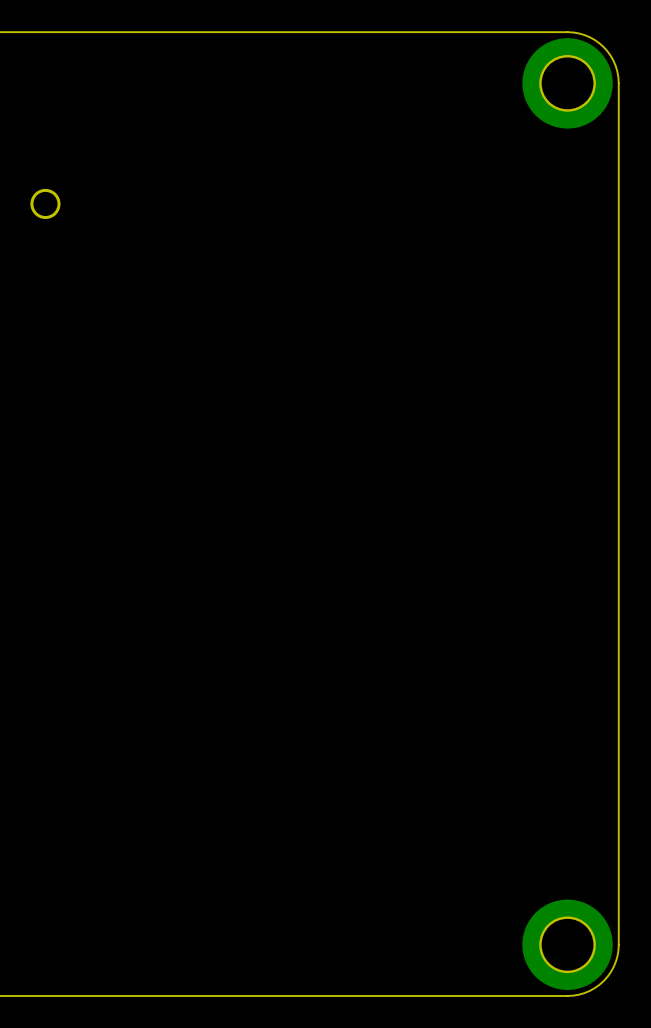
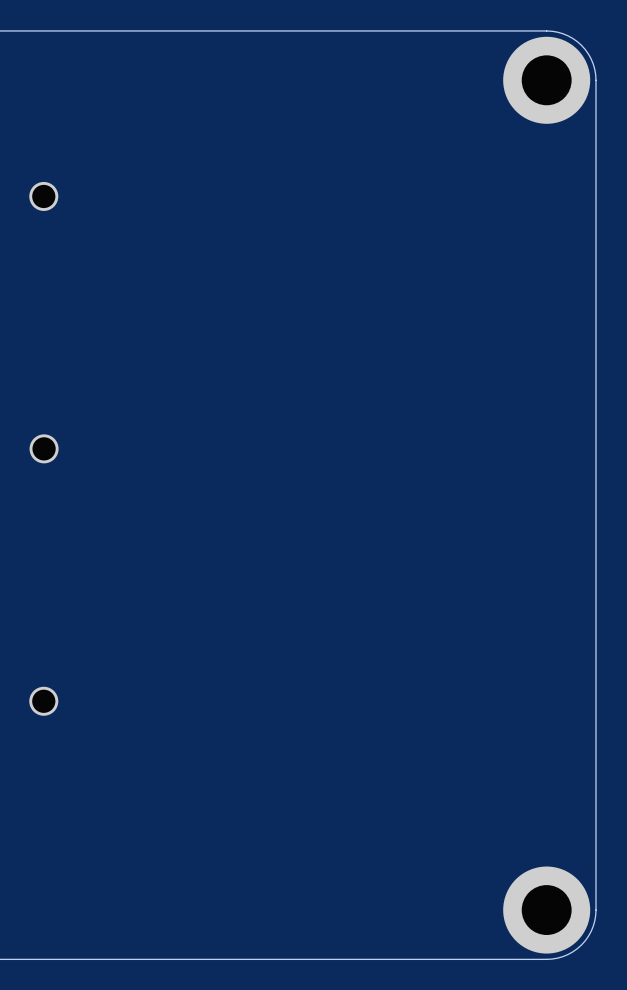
part: none -> (44, 448)
part: none -> (43, 701)

